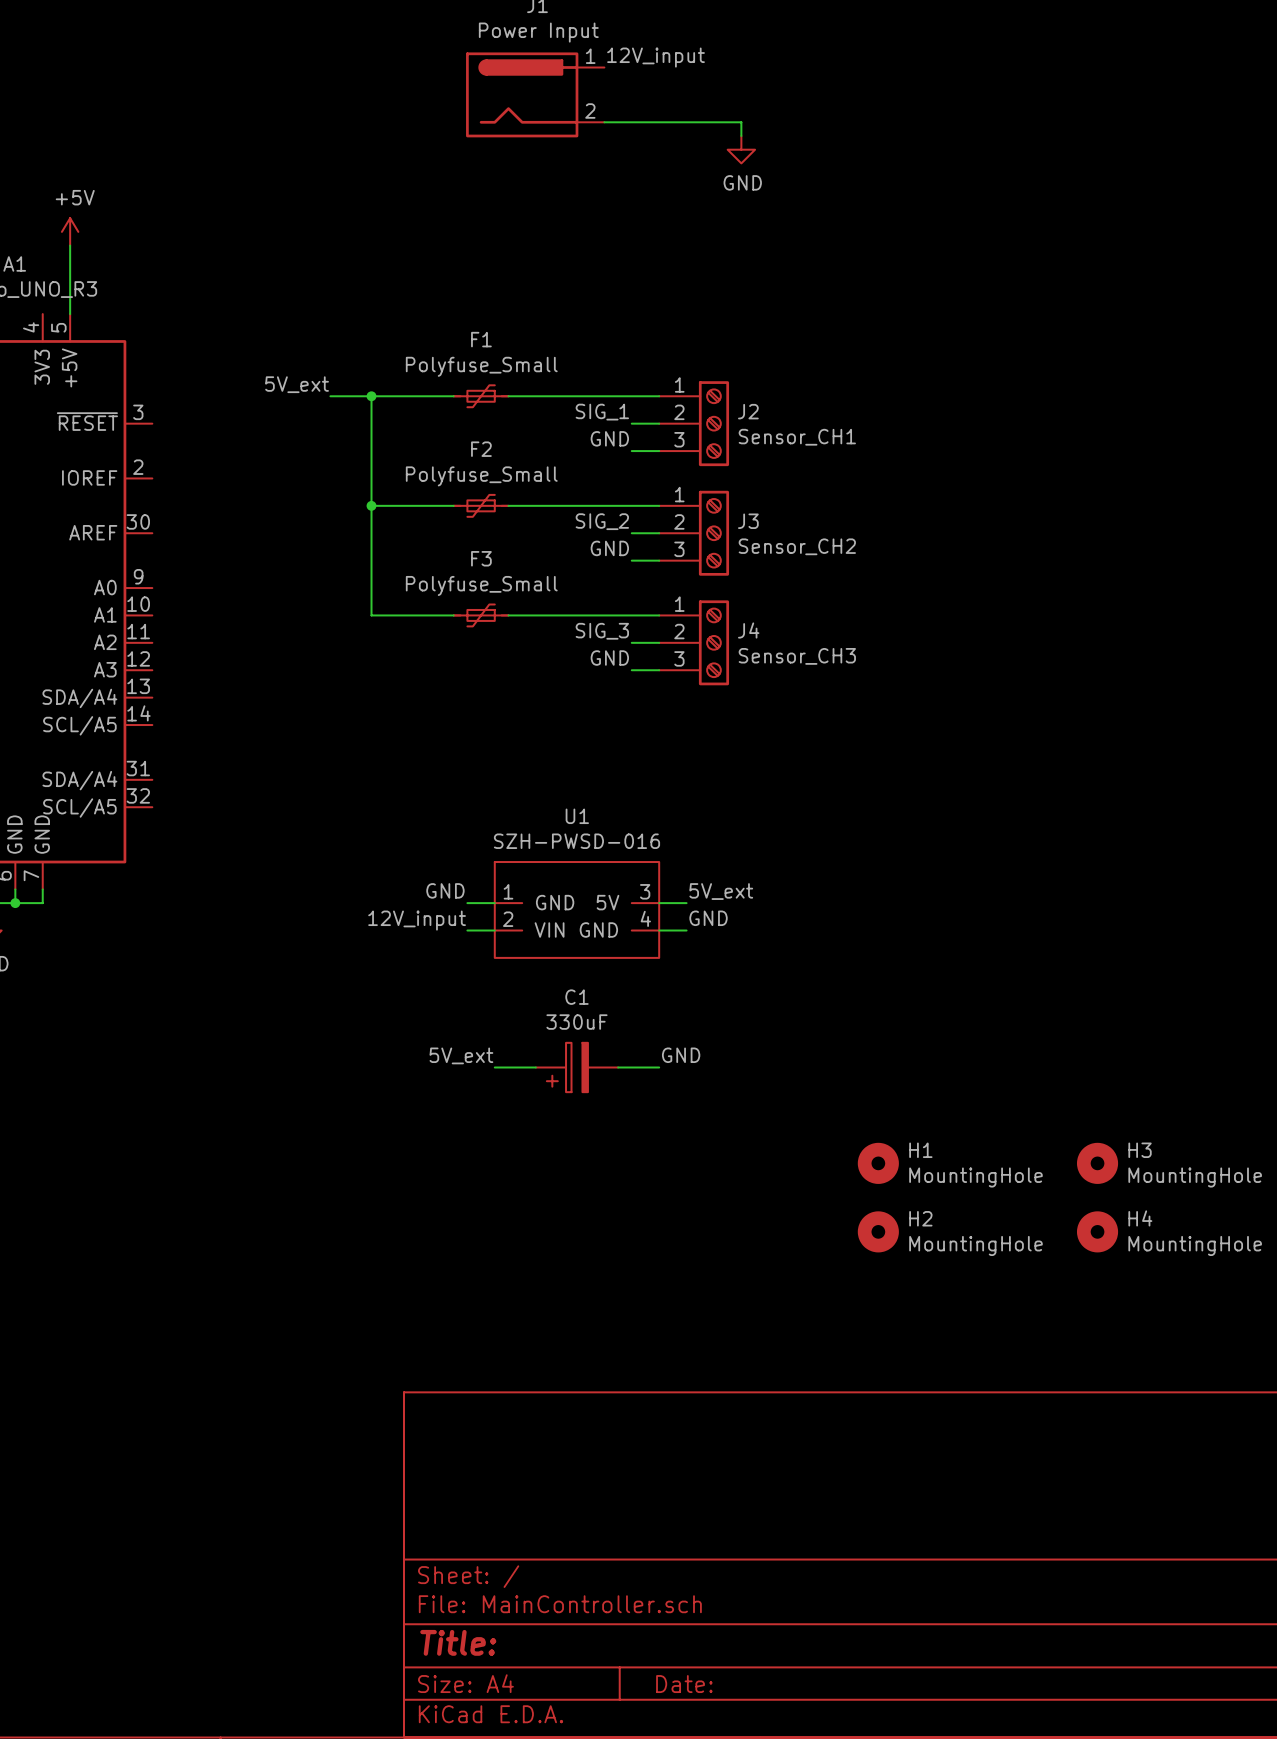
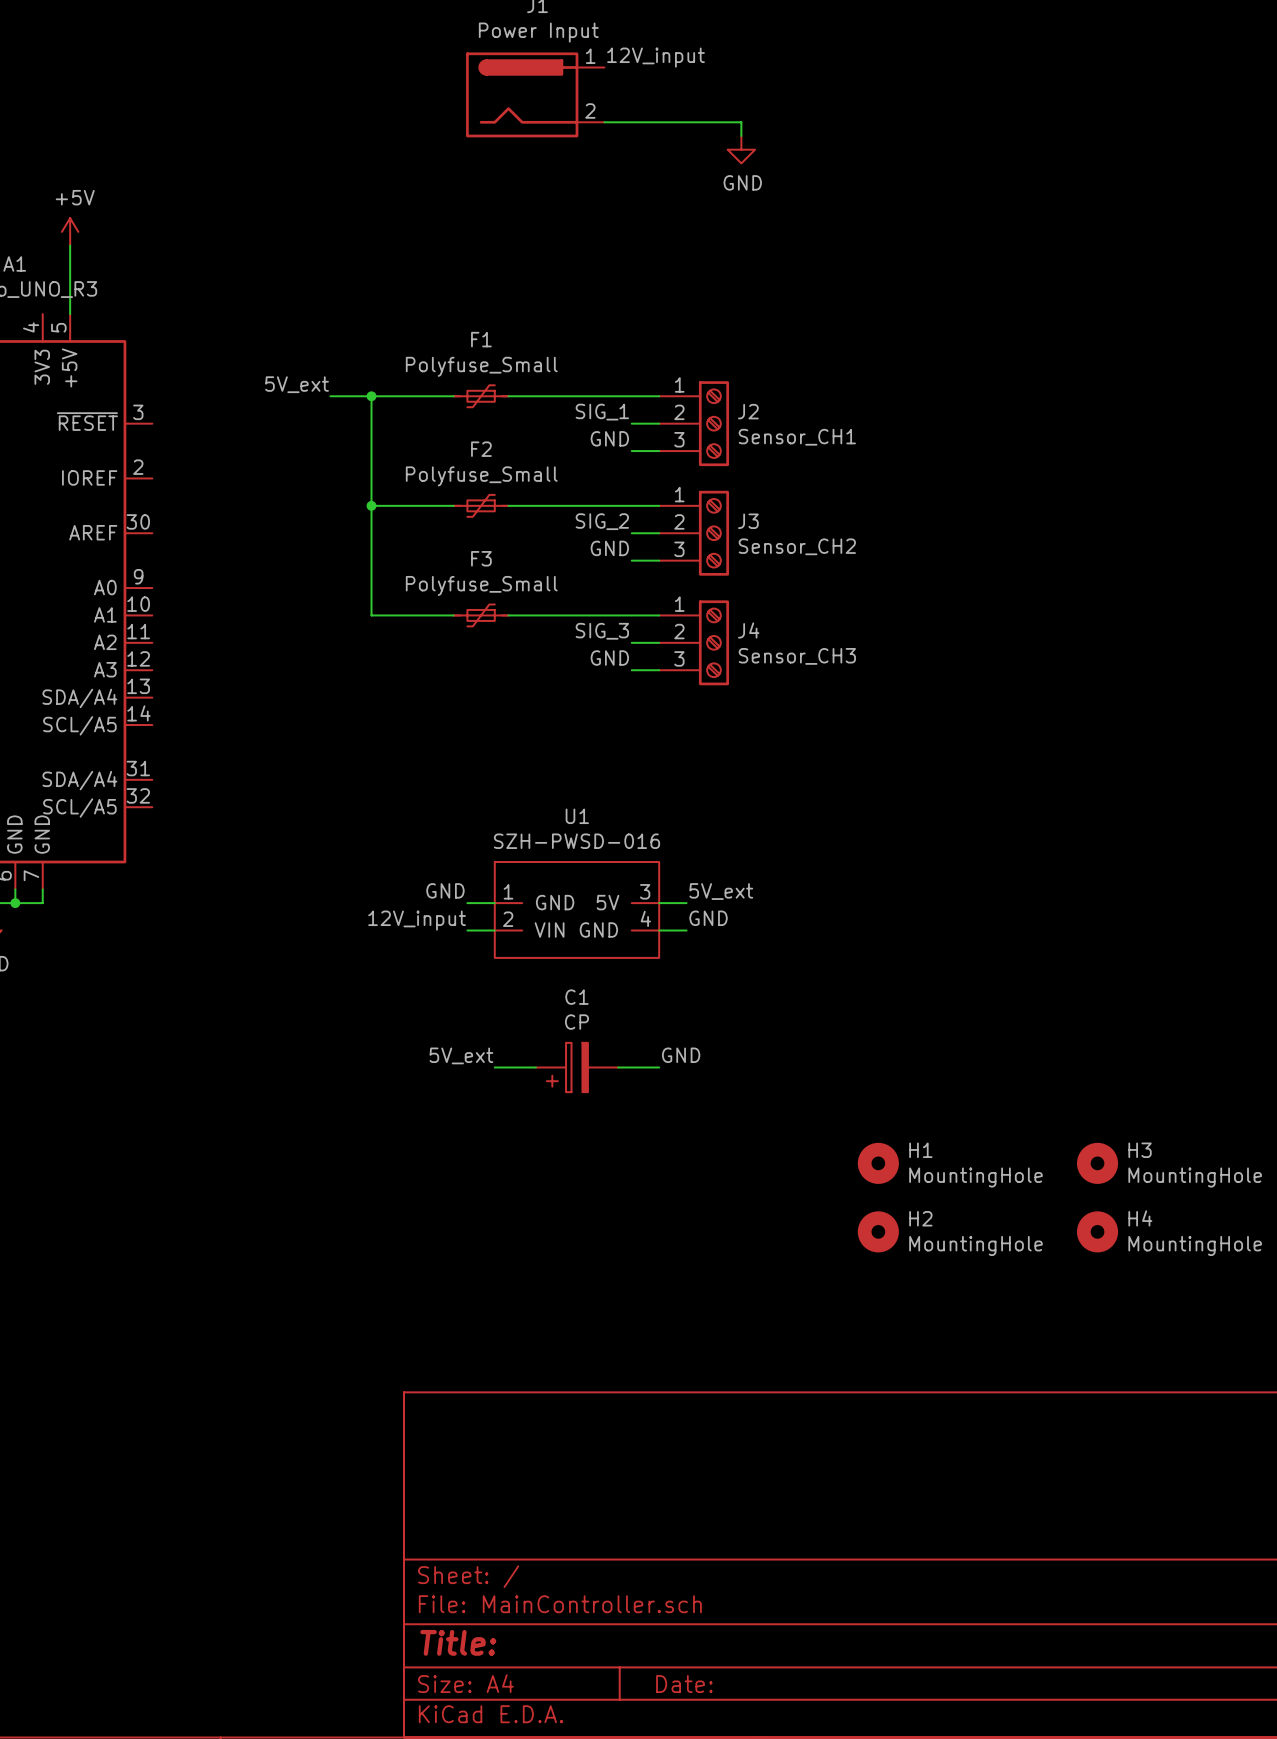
C1 value: 330uF (576, 1022) -> CP (576, 1022)

